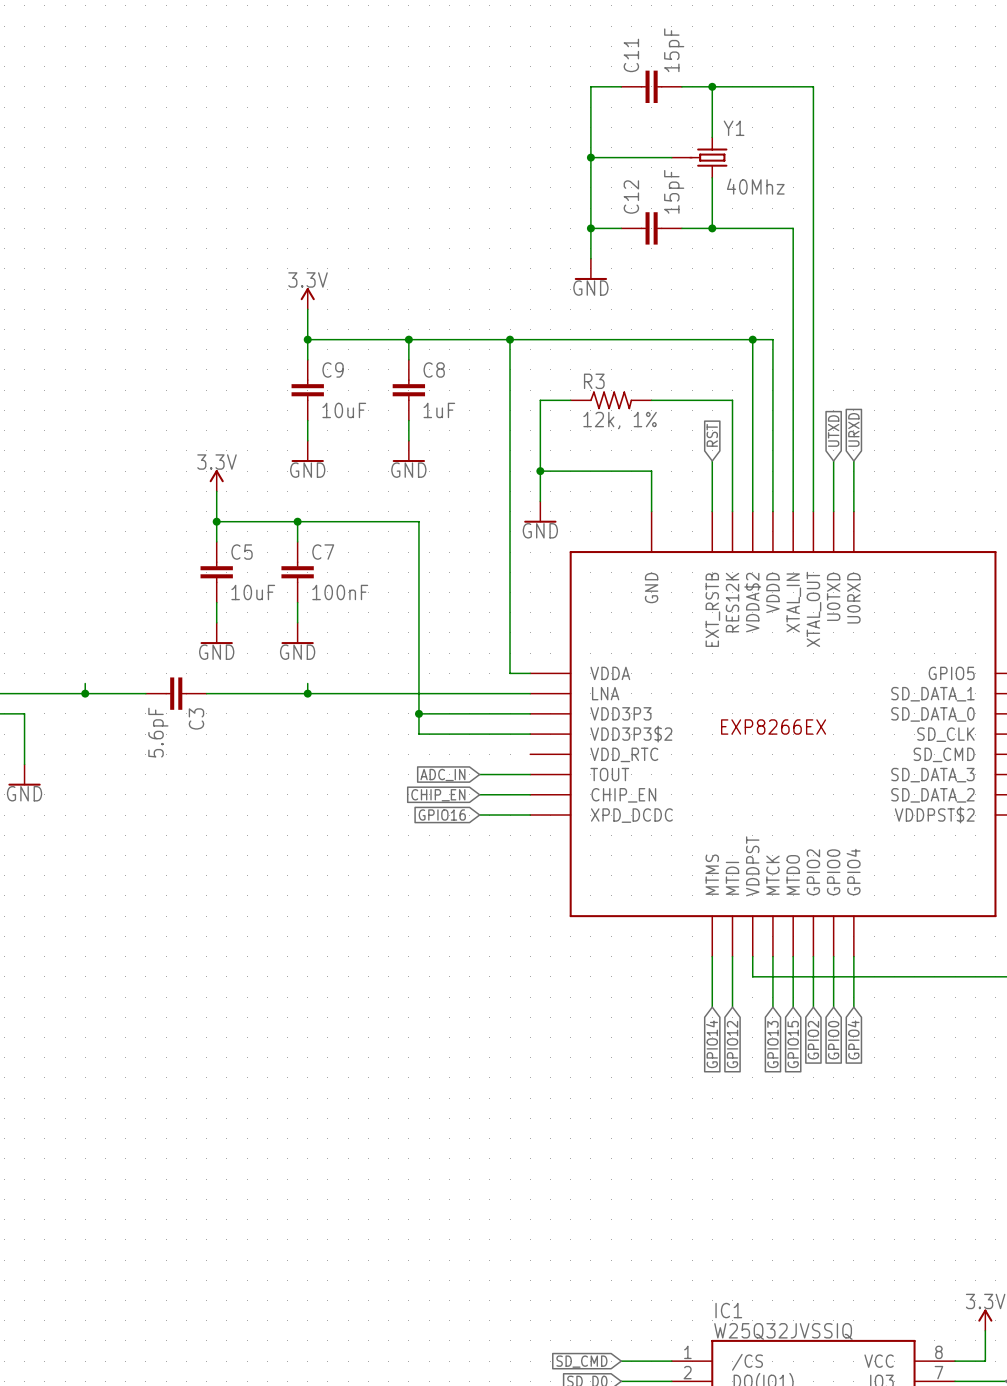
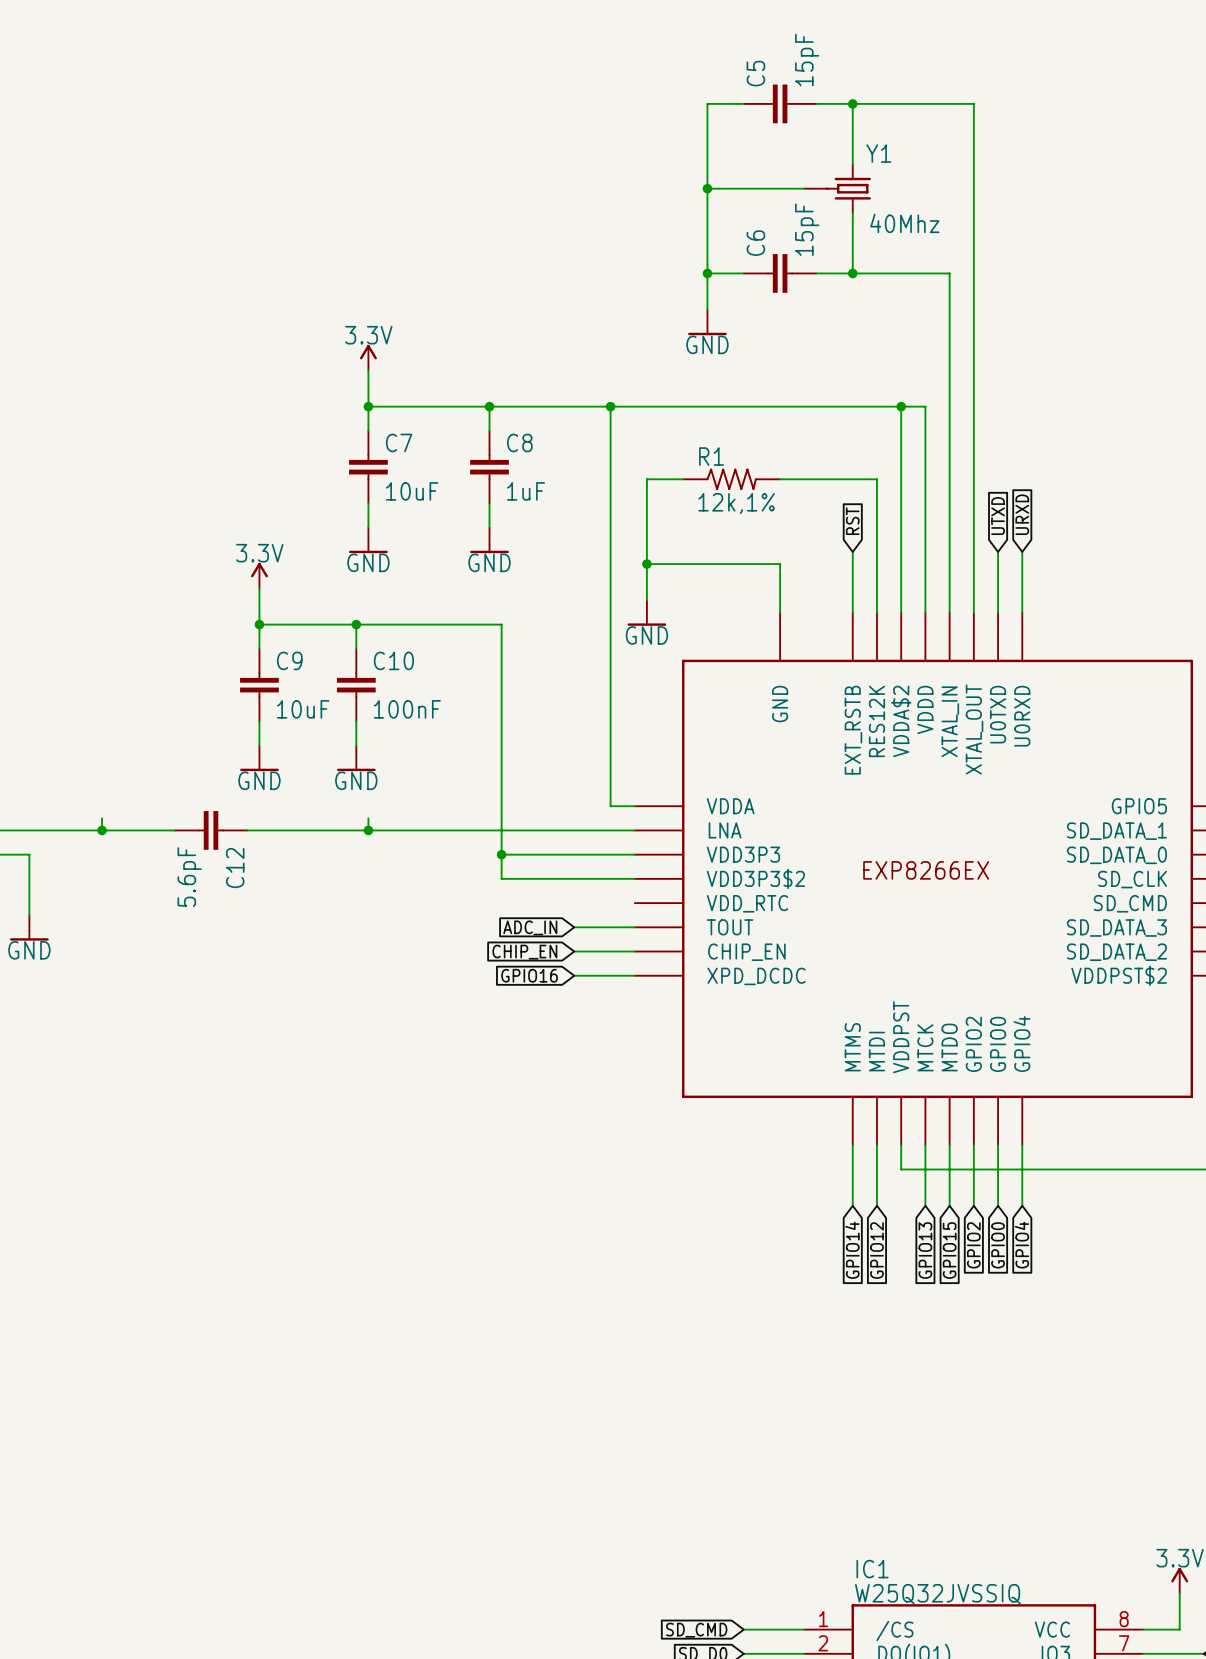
C11 name: C11 (631, 55) -> C5 (755, 73)
C12 name: C12 (631, 197) -> C6 (755, 243)
C9 name: C9 (333, 369) -> C7 (399, 442)
R3 name: R3 (594, 381) -> R1 (711, 456)
R3 value: 12k, 1% (620, 420) -> 12k,1% (736, 503)
C5 name: C5 (242, 552) -> C9 (289, 660)
C7 name: C7 (323, 552) -> C10 (393, 660)
C3 name: C3 (196, 718) -> C12 (235, 868)

